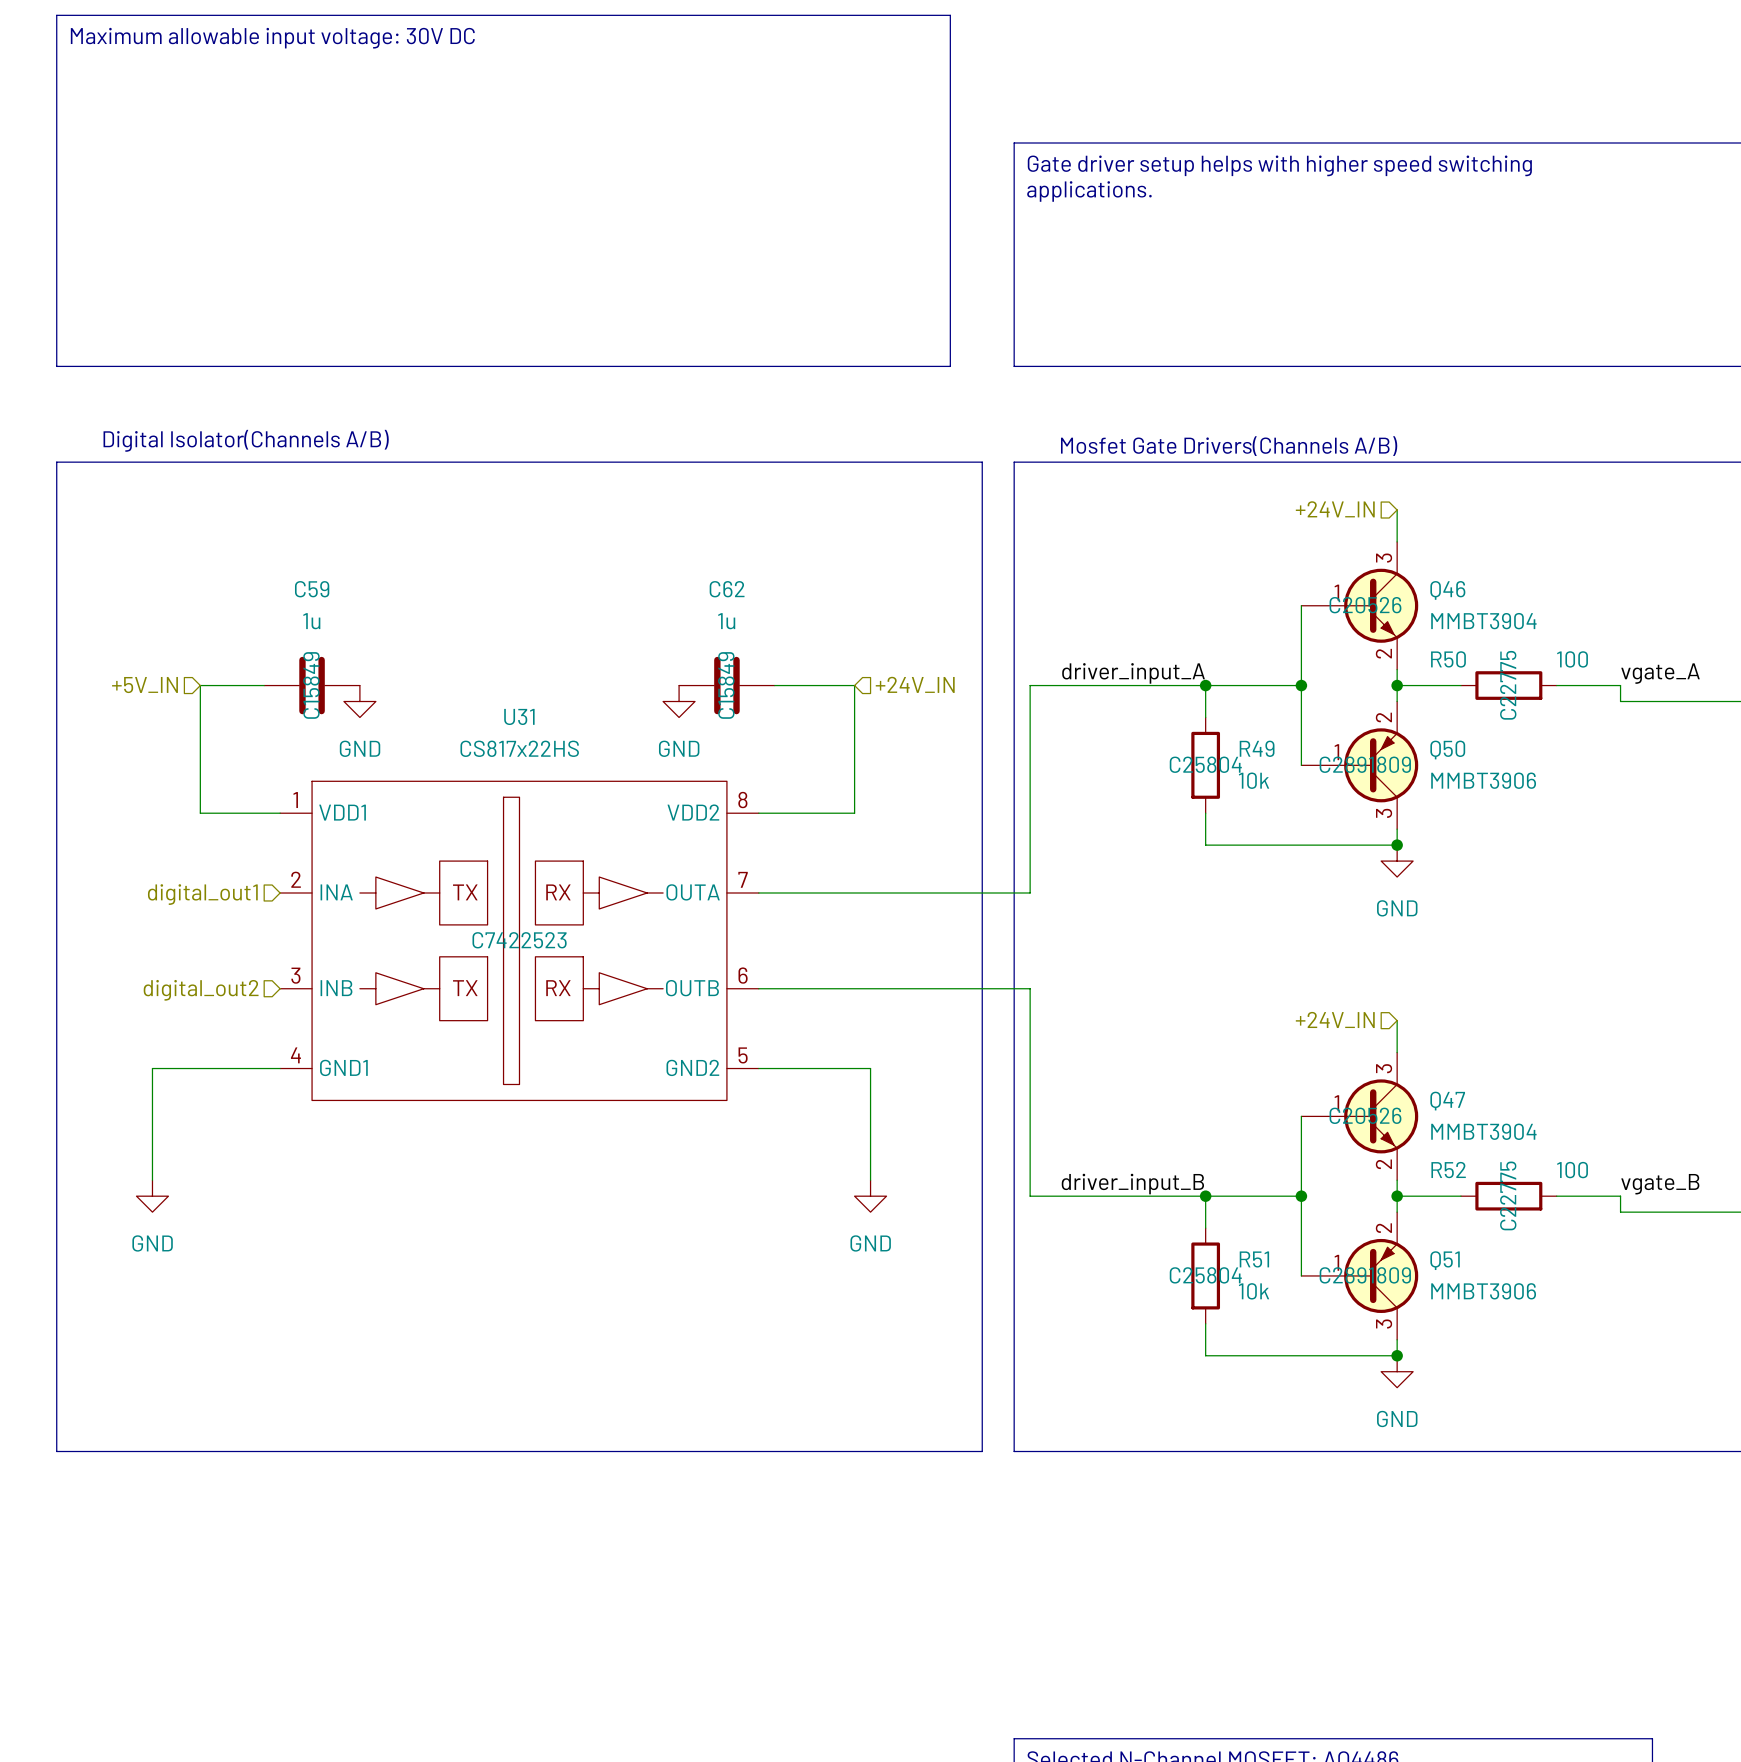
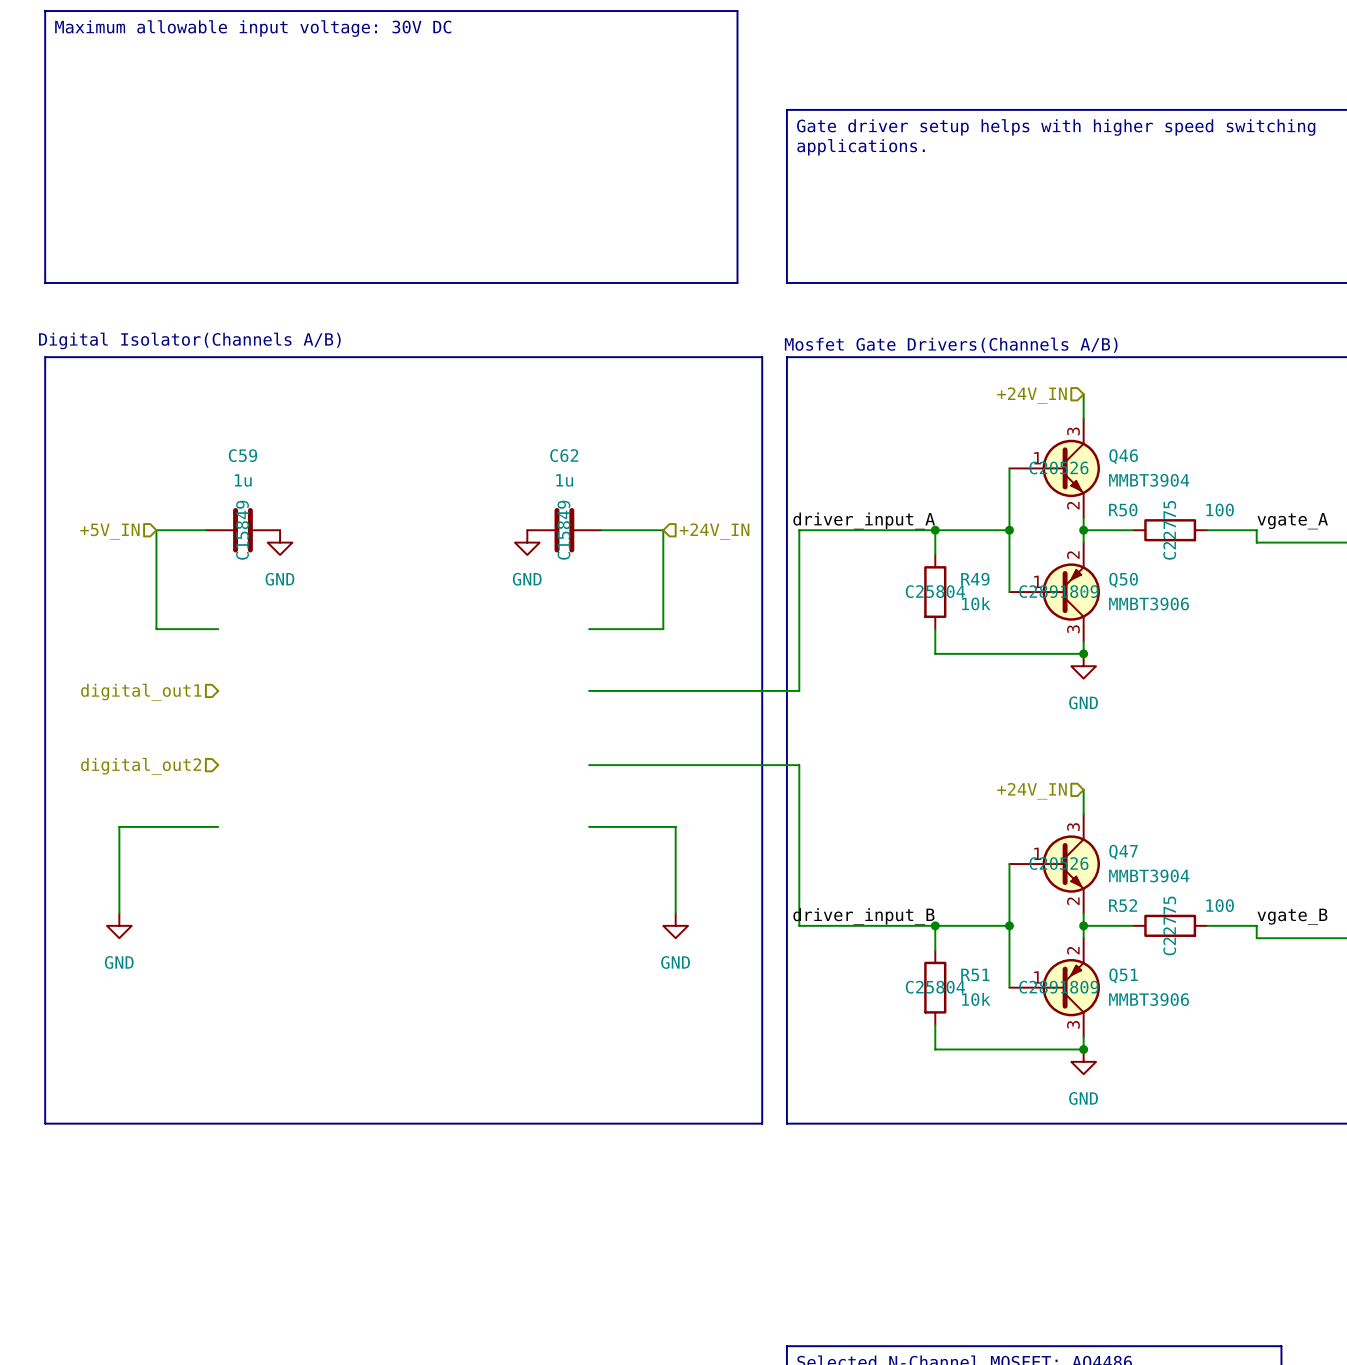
U31: CS817x22HS (519, 940) -> none

